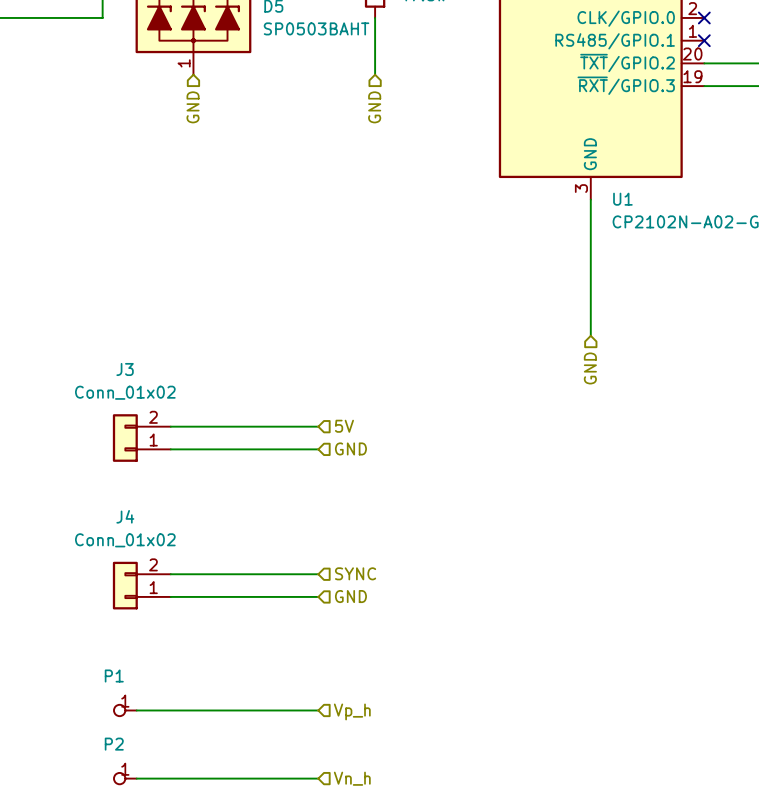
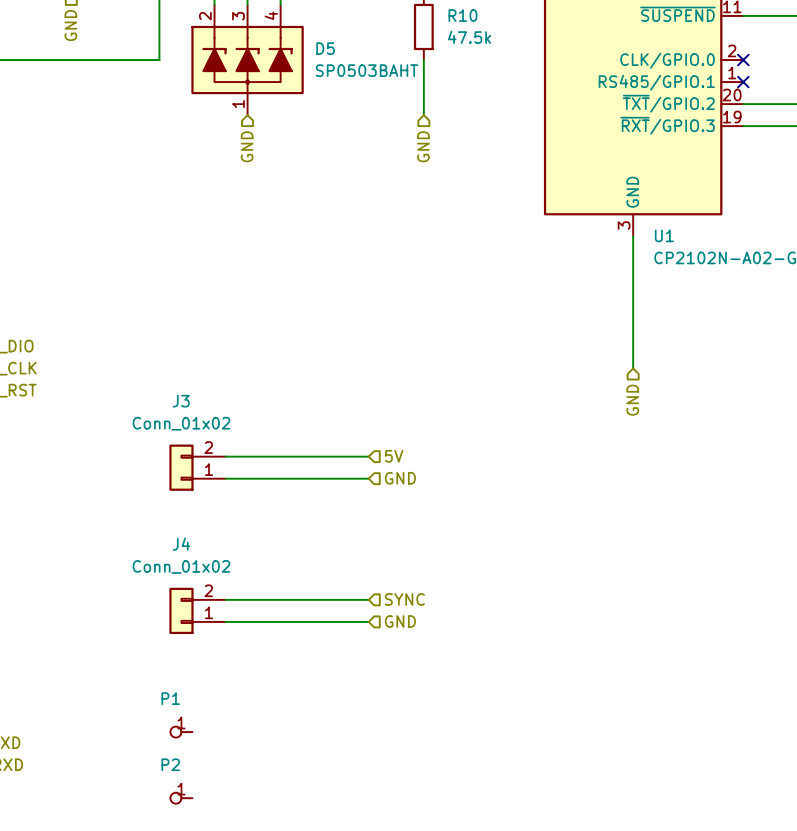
wire: (136, 710) (318, 710) -> none
hierarchical label: Vp_h (352, 711) -> none
wire: (136, 778) (318, 778) -> none
hierarchical label: Vn_h (352, 778) -> none

